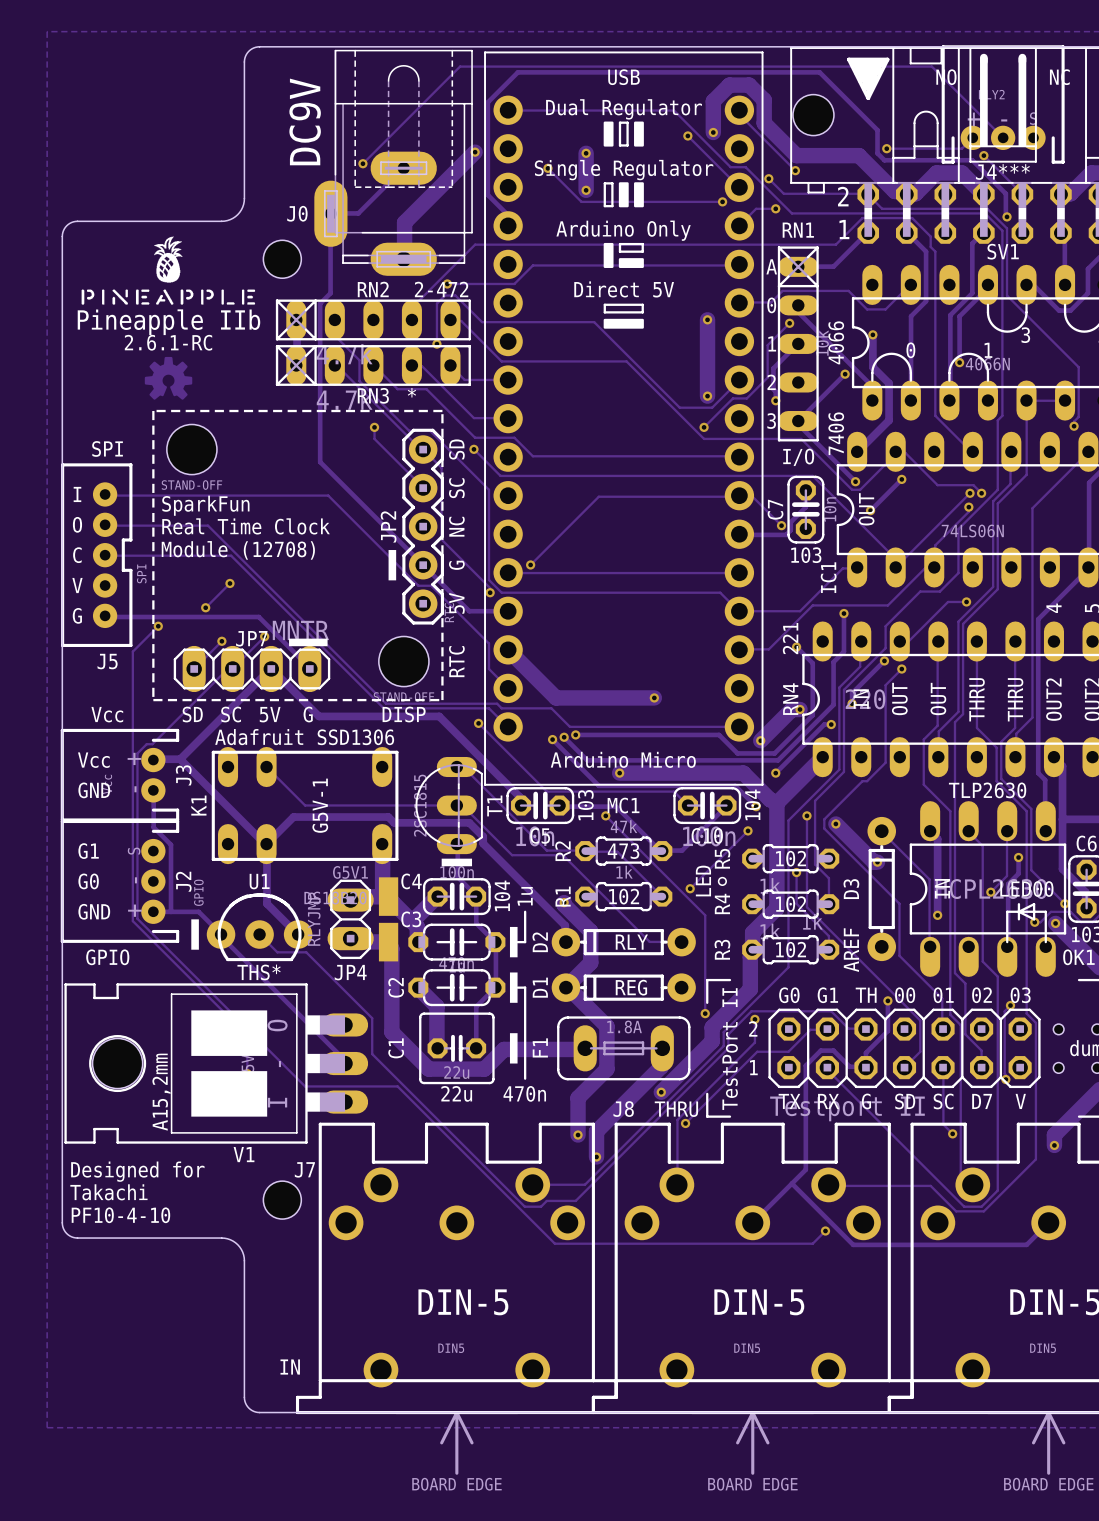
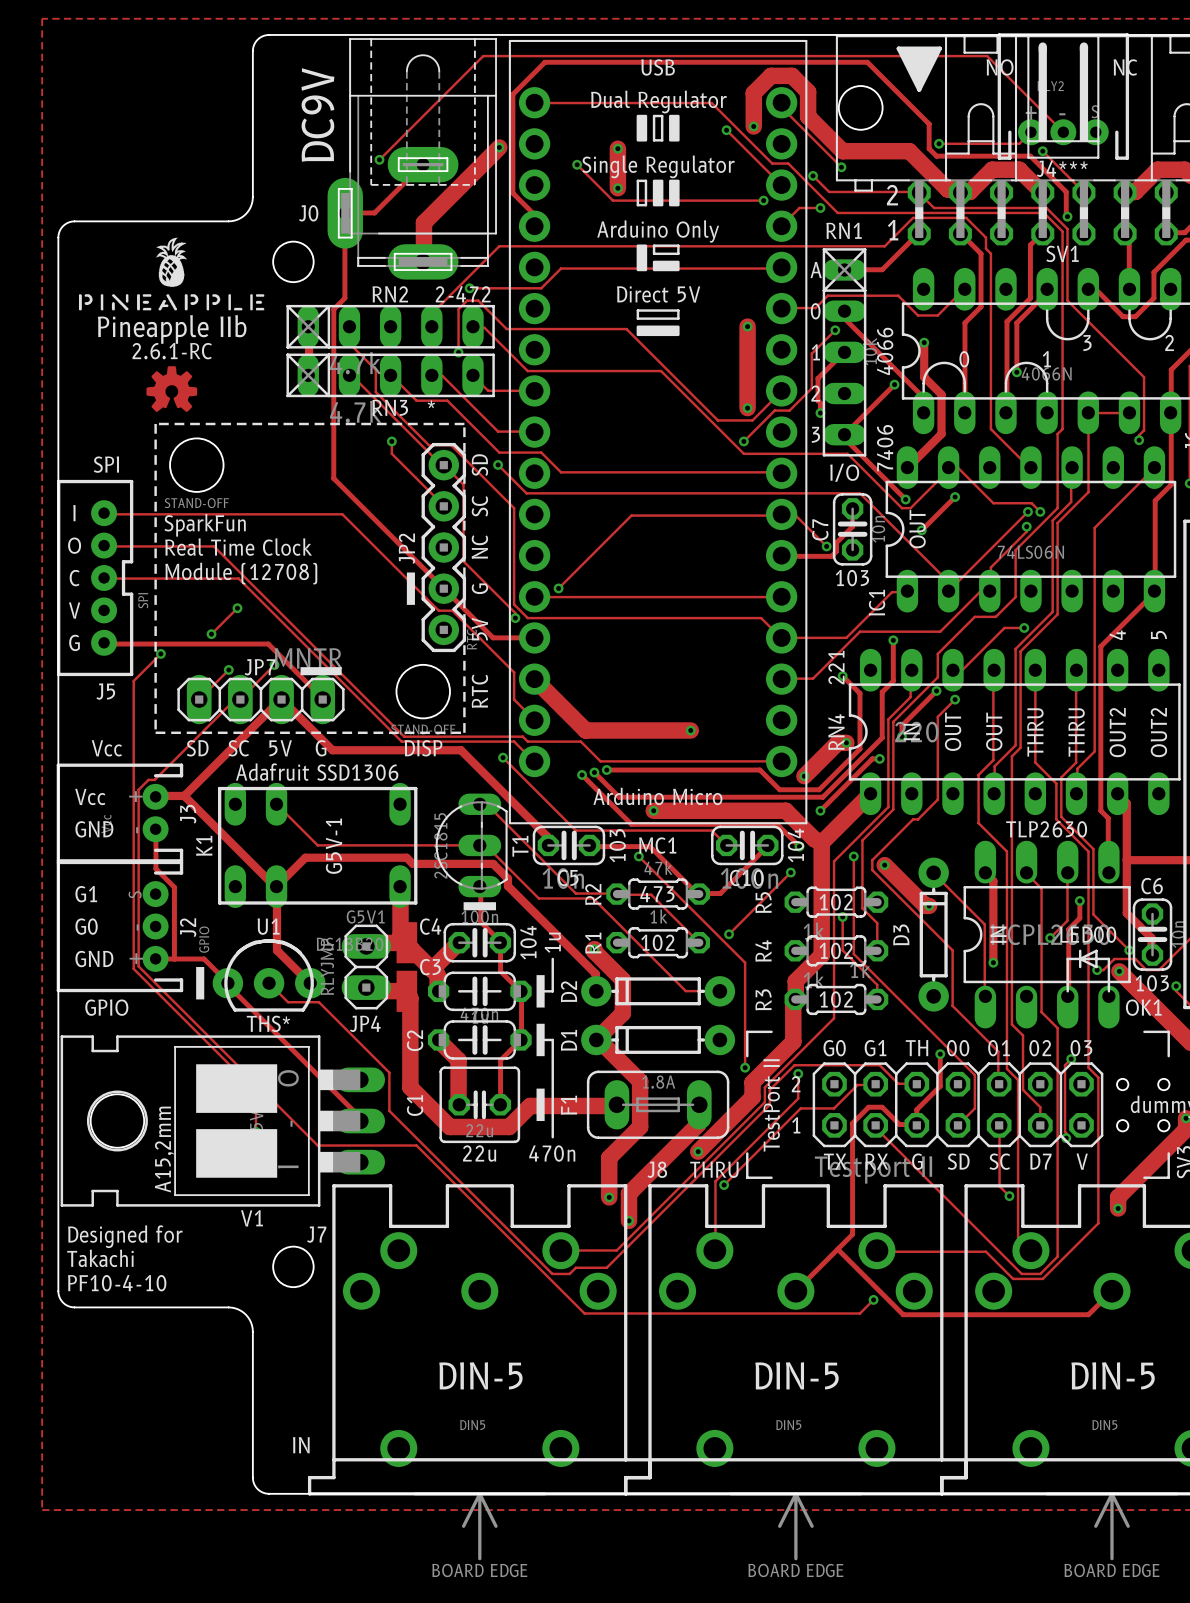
drawing: [717, 876, 727, 886] -> none
text: LED (703, 881) -> none
text: RLY (631, 942) -> none
text: AREF (851, 950) -> none
text: REG (631, 987) -> none

